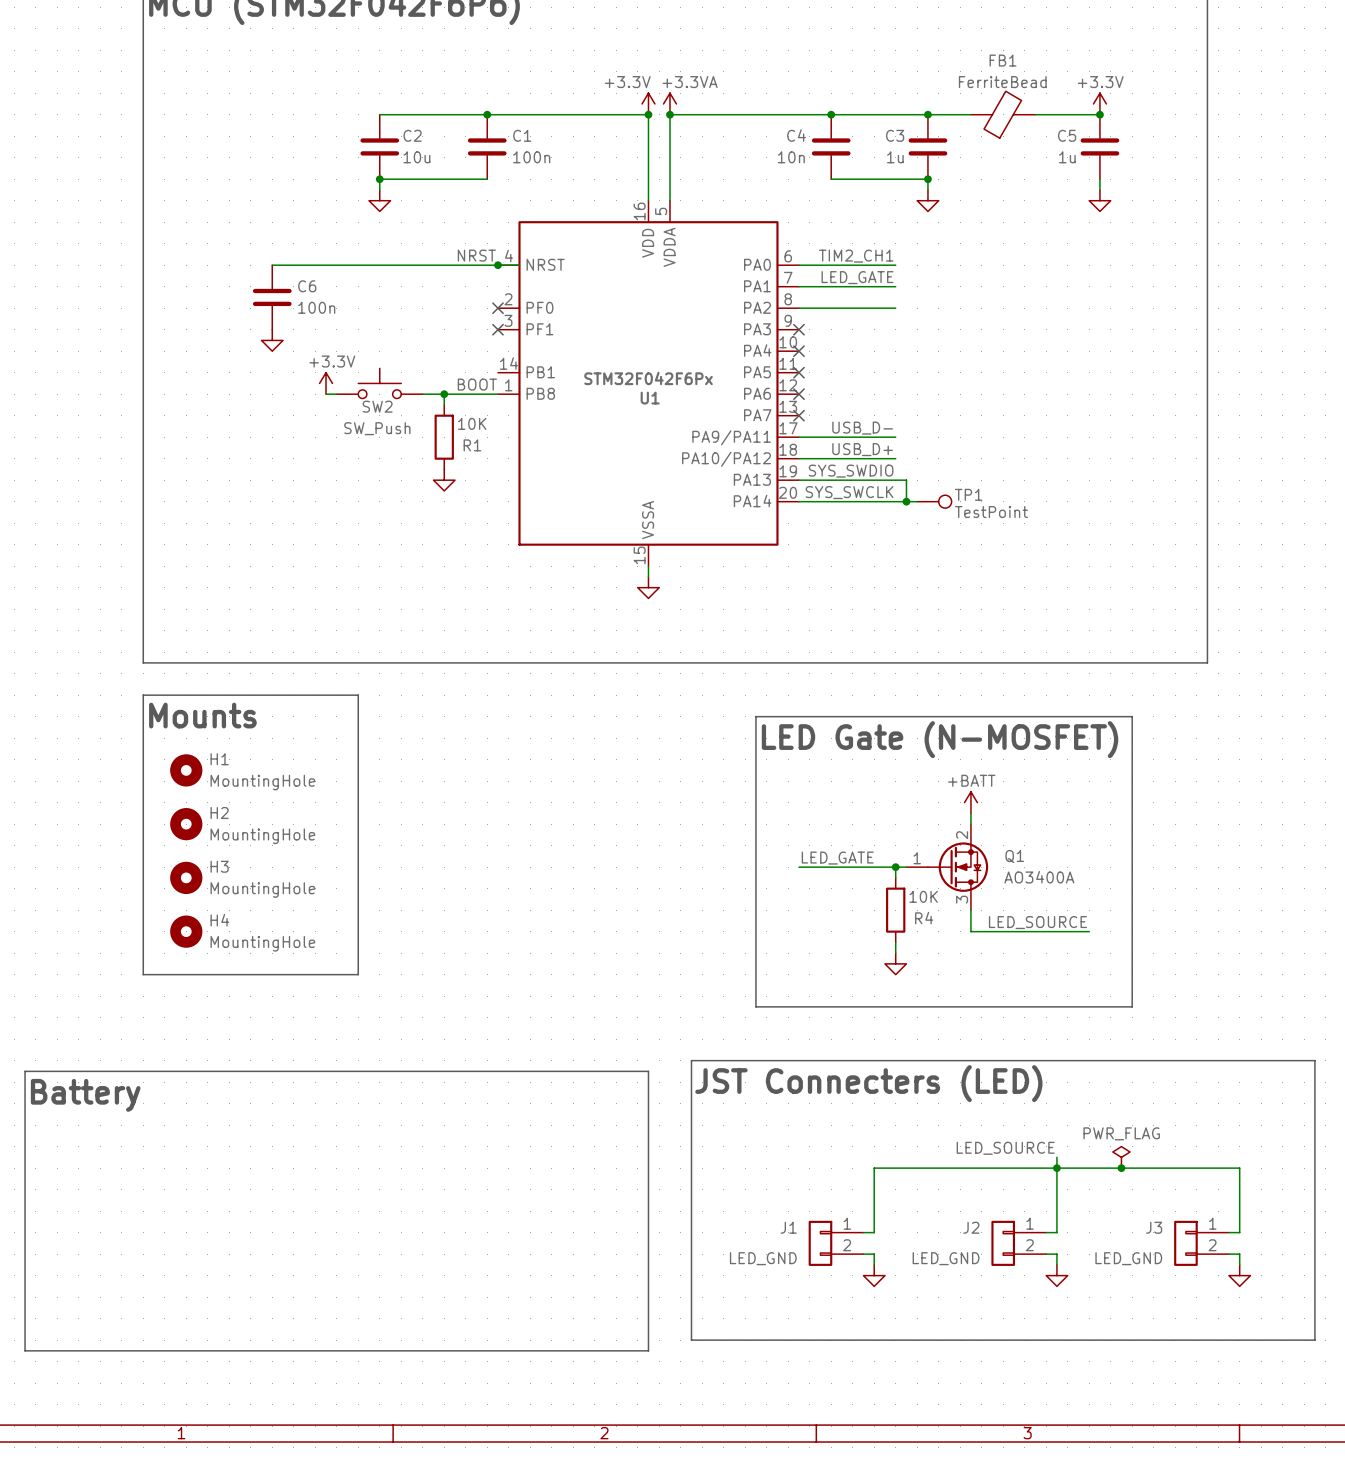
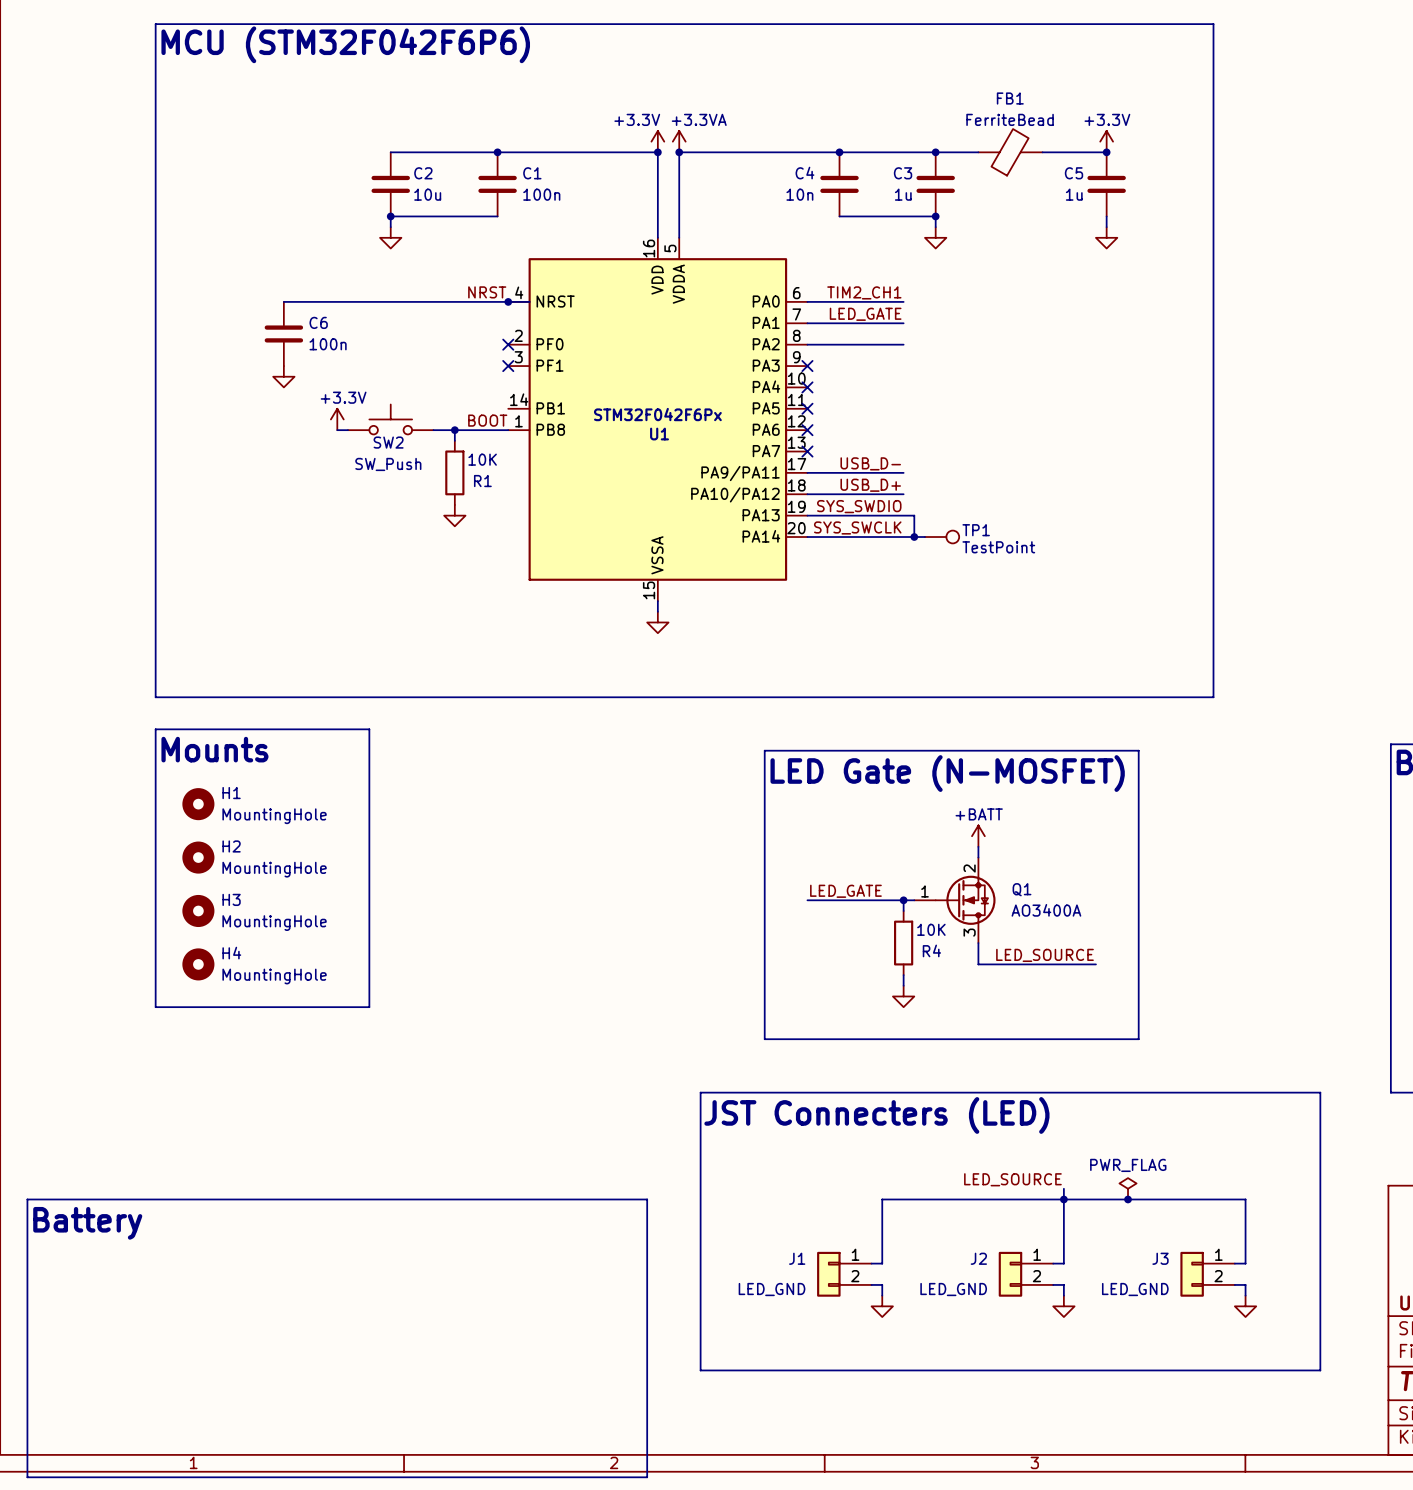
line: (25, 1071) (648, 1071) (648, 1350) (25, 1350) (25, 1071) -> (27, 1199) (647, 1199) (647, 1477) (27, 1477) (27, 1199)
text position: Battery (85, 1095) -> Battery (87, 1223)

